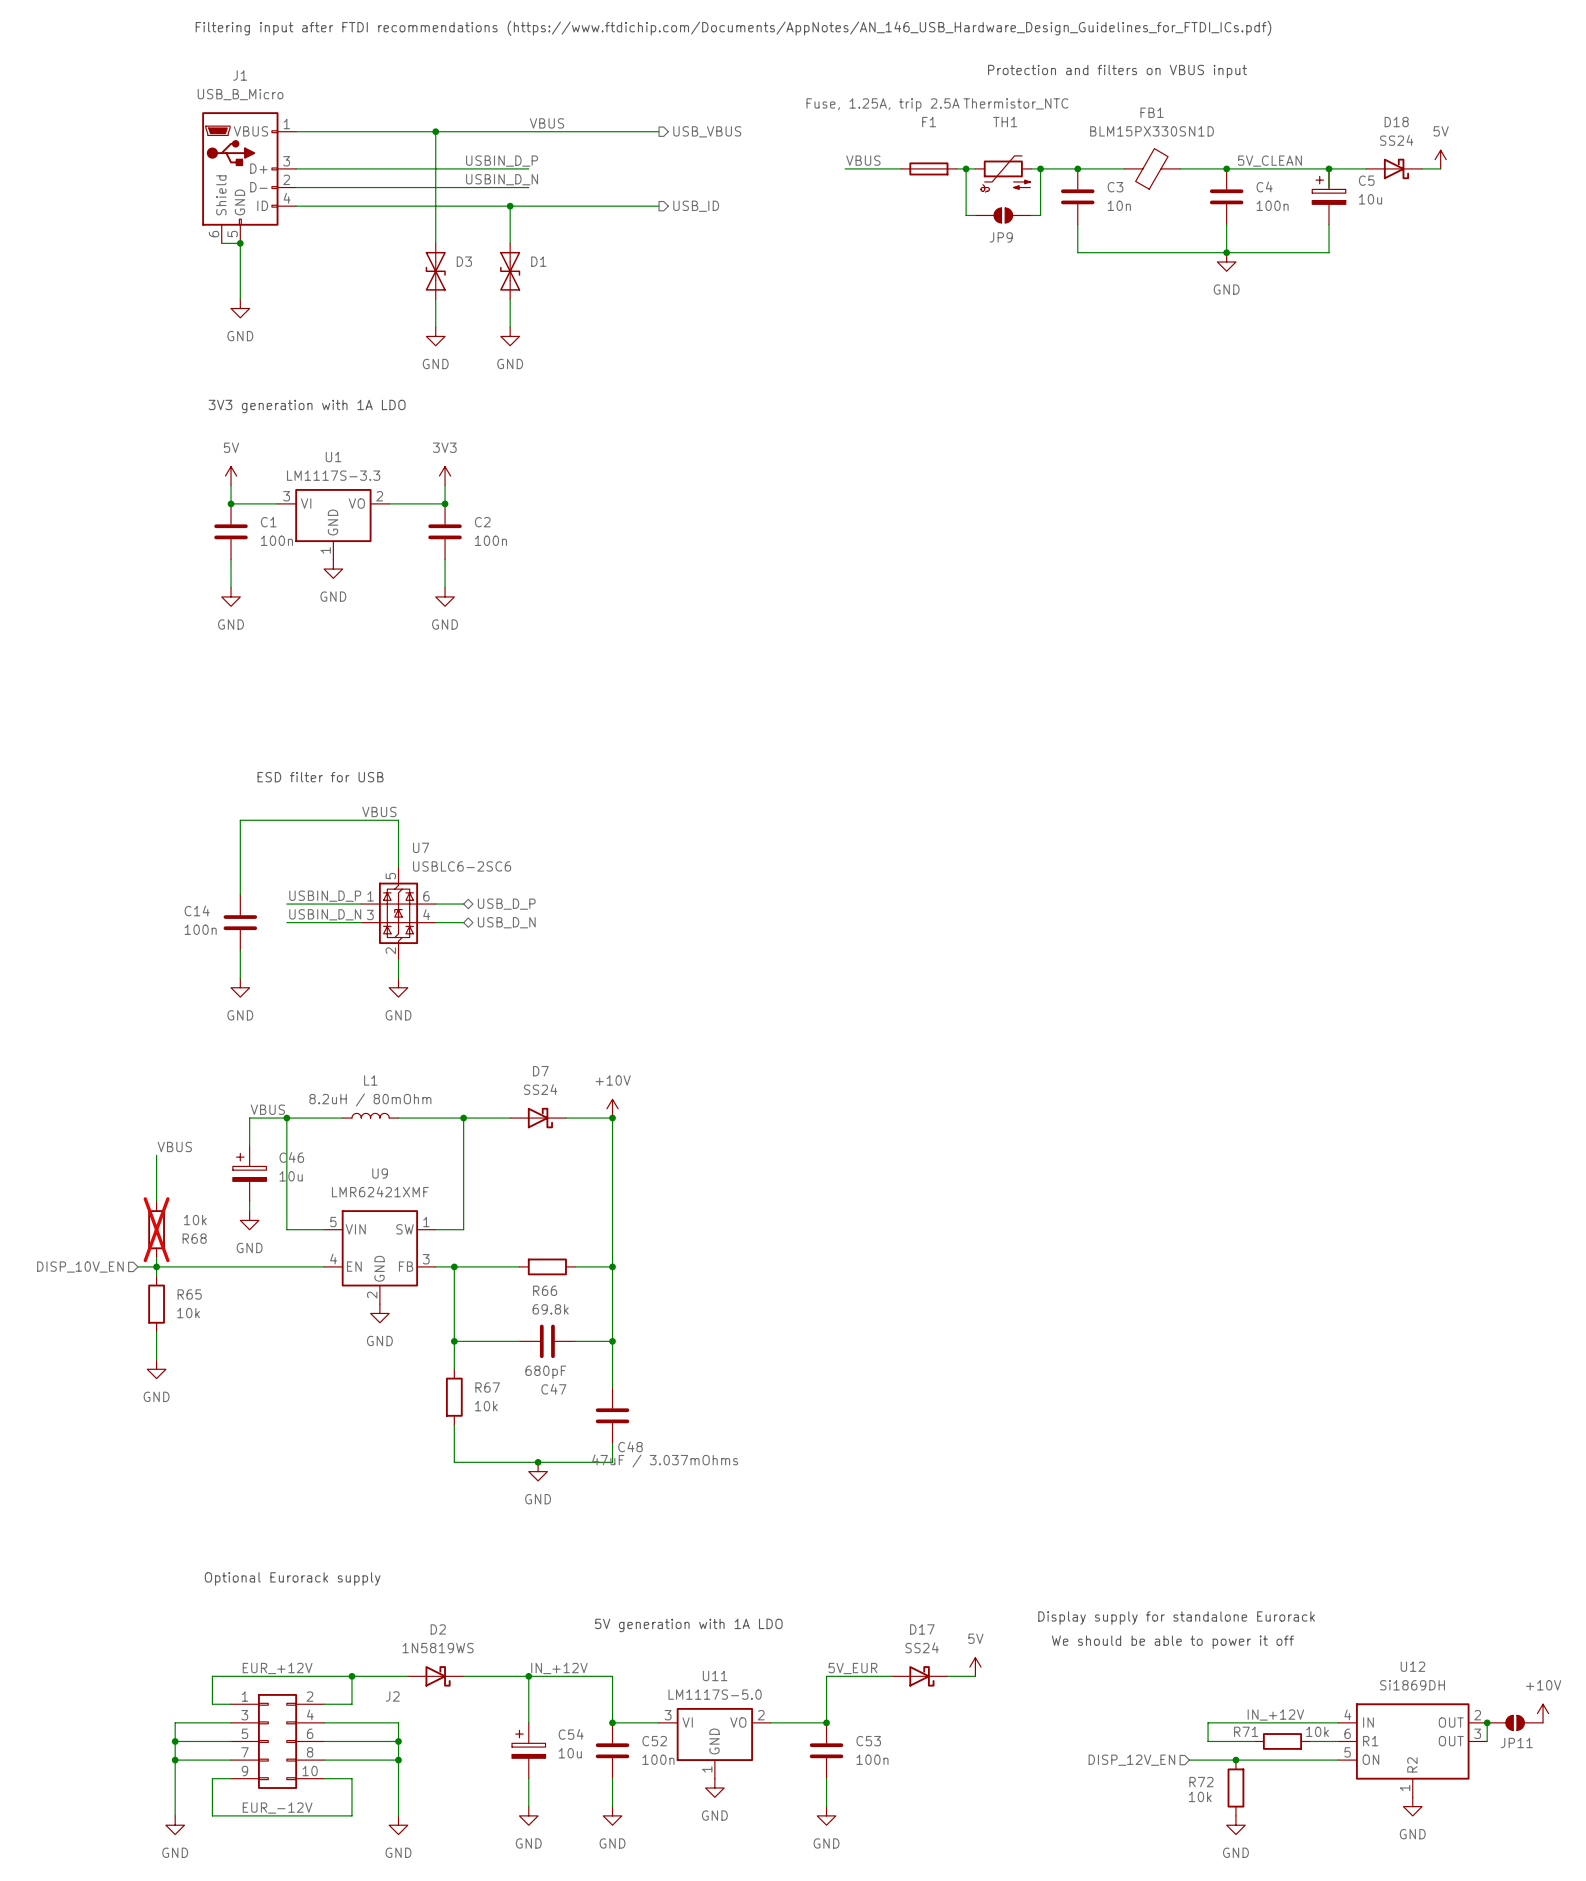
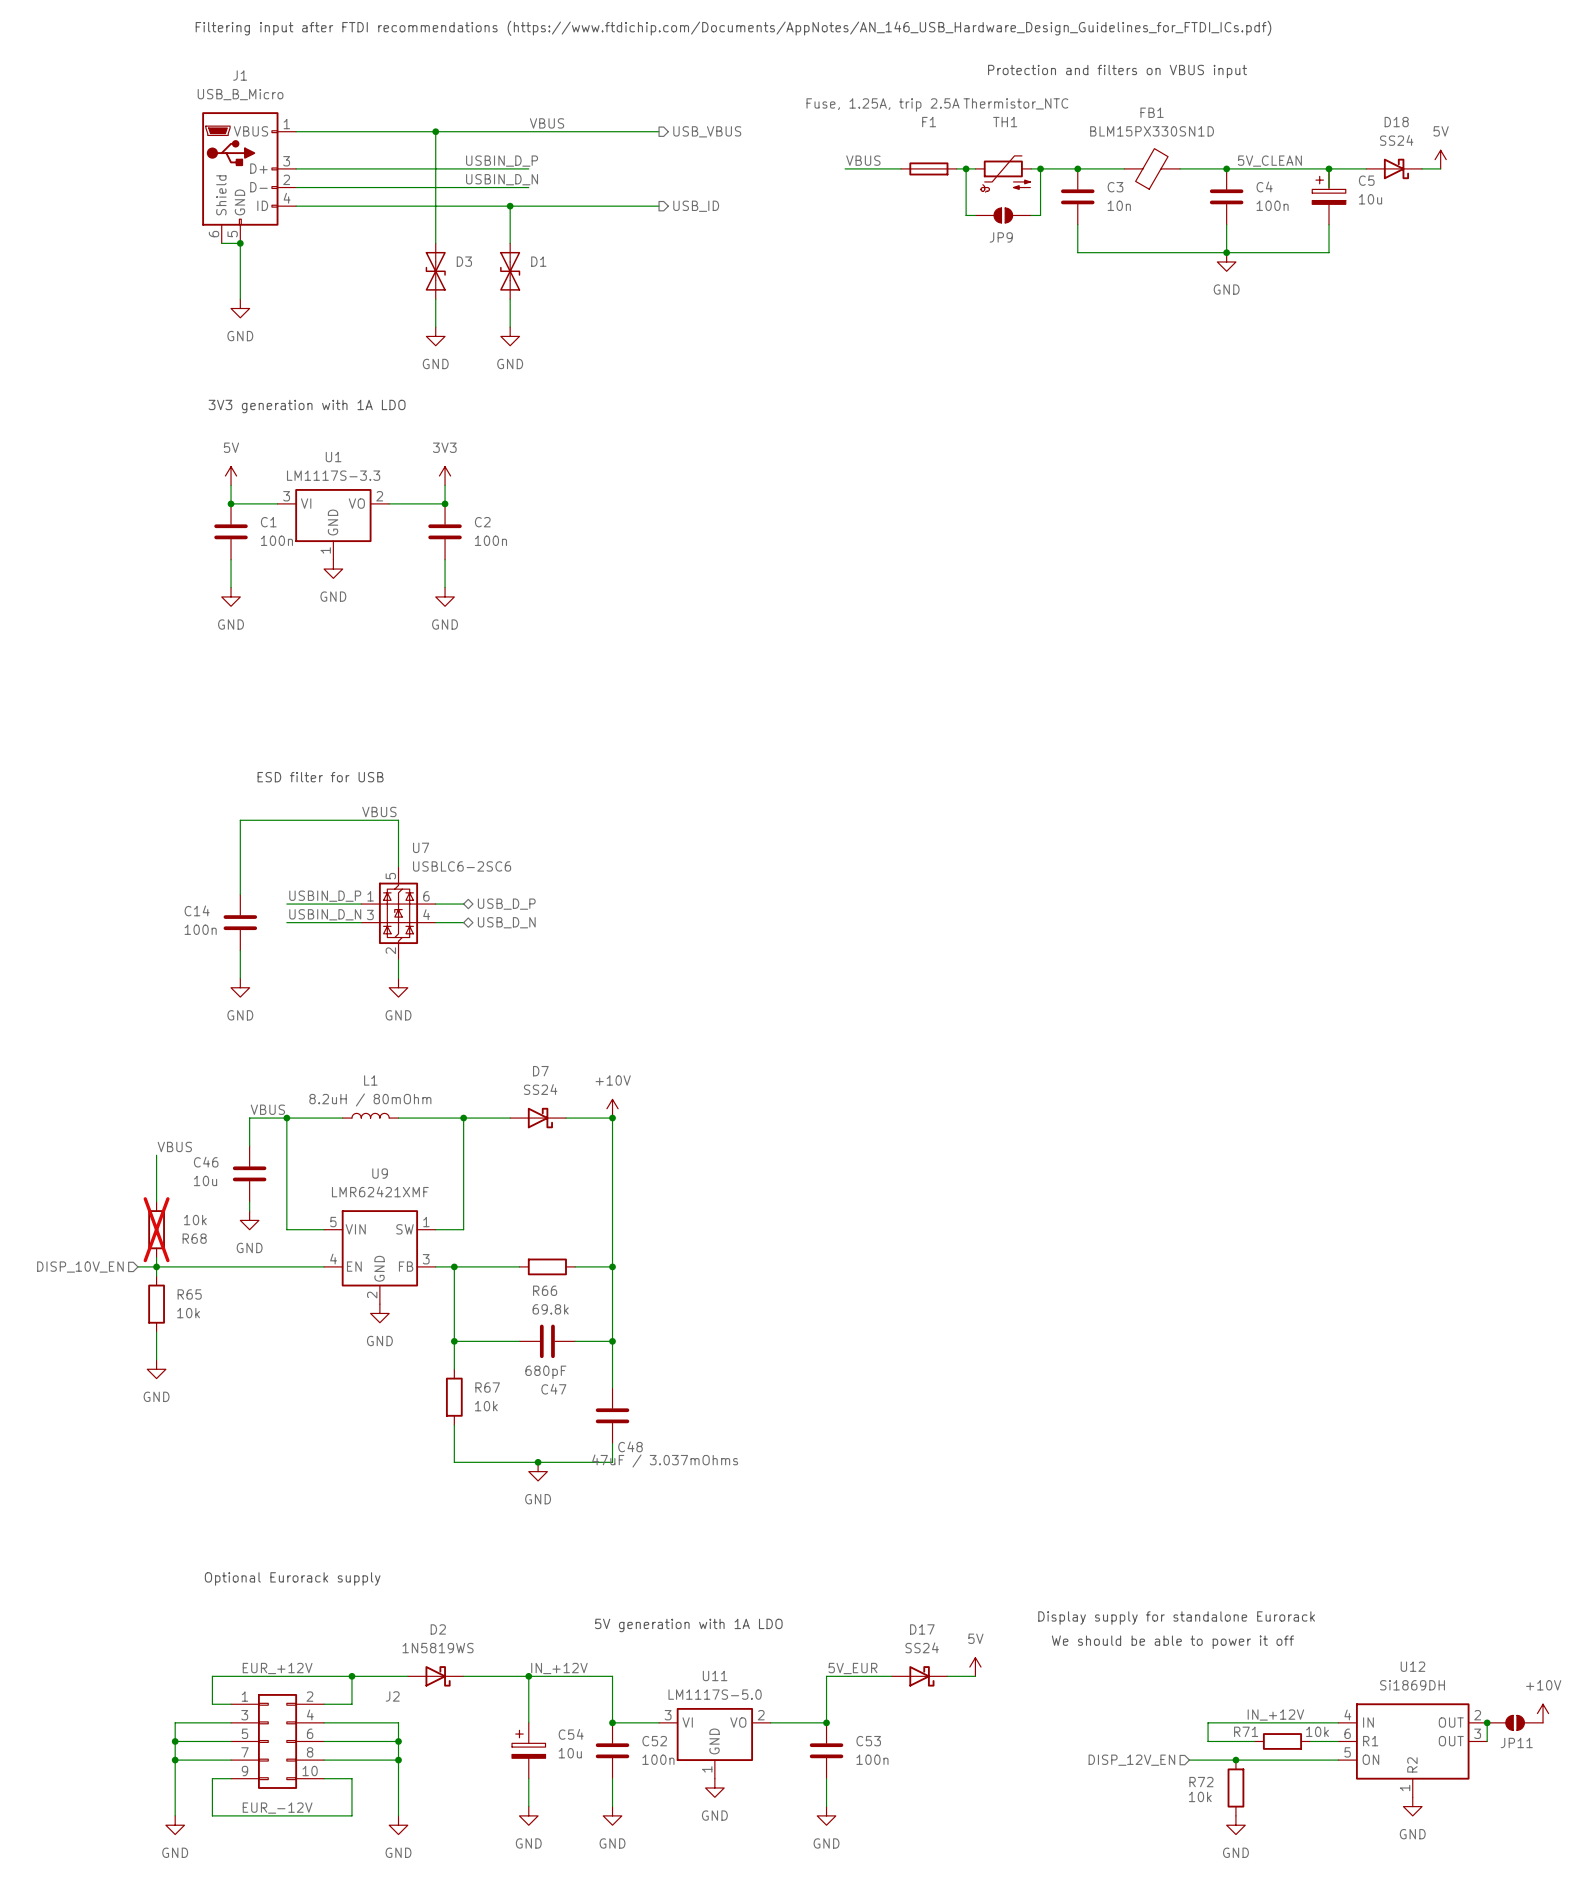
C46 symbol: [232, 1145, 267, 1202] -> [232, 1145, 267, 1202]
C46 name position: C46 (291, 1157) -> C46 (206, 1162)
C46 value position: 10u (291, 1176) -> 10u (205, 1180)

